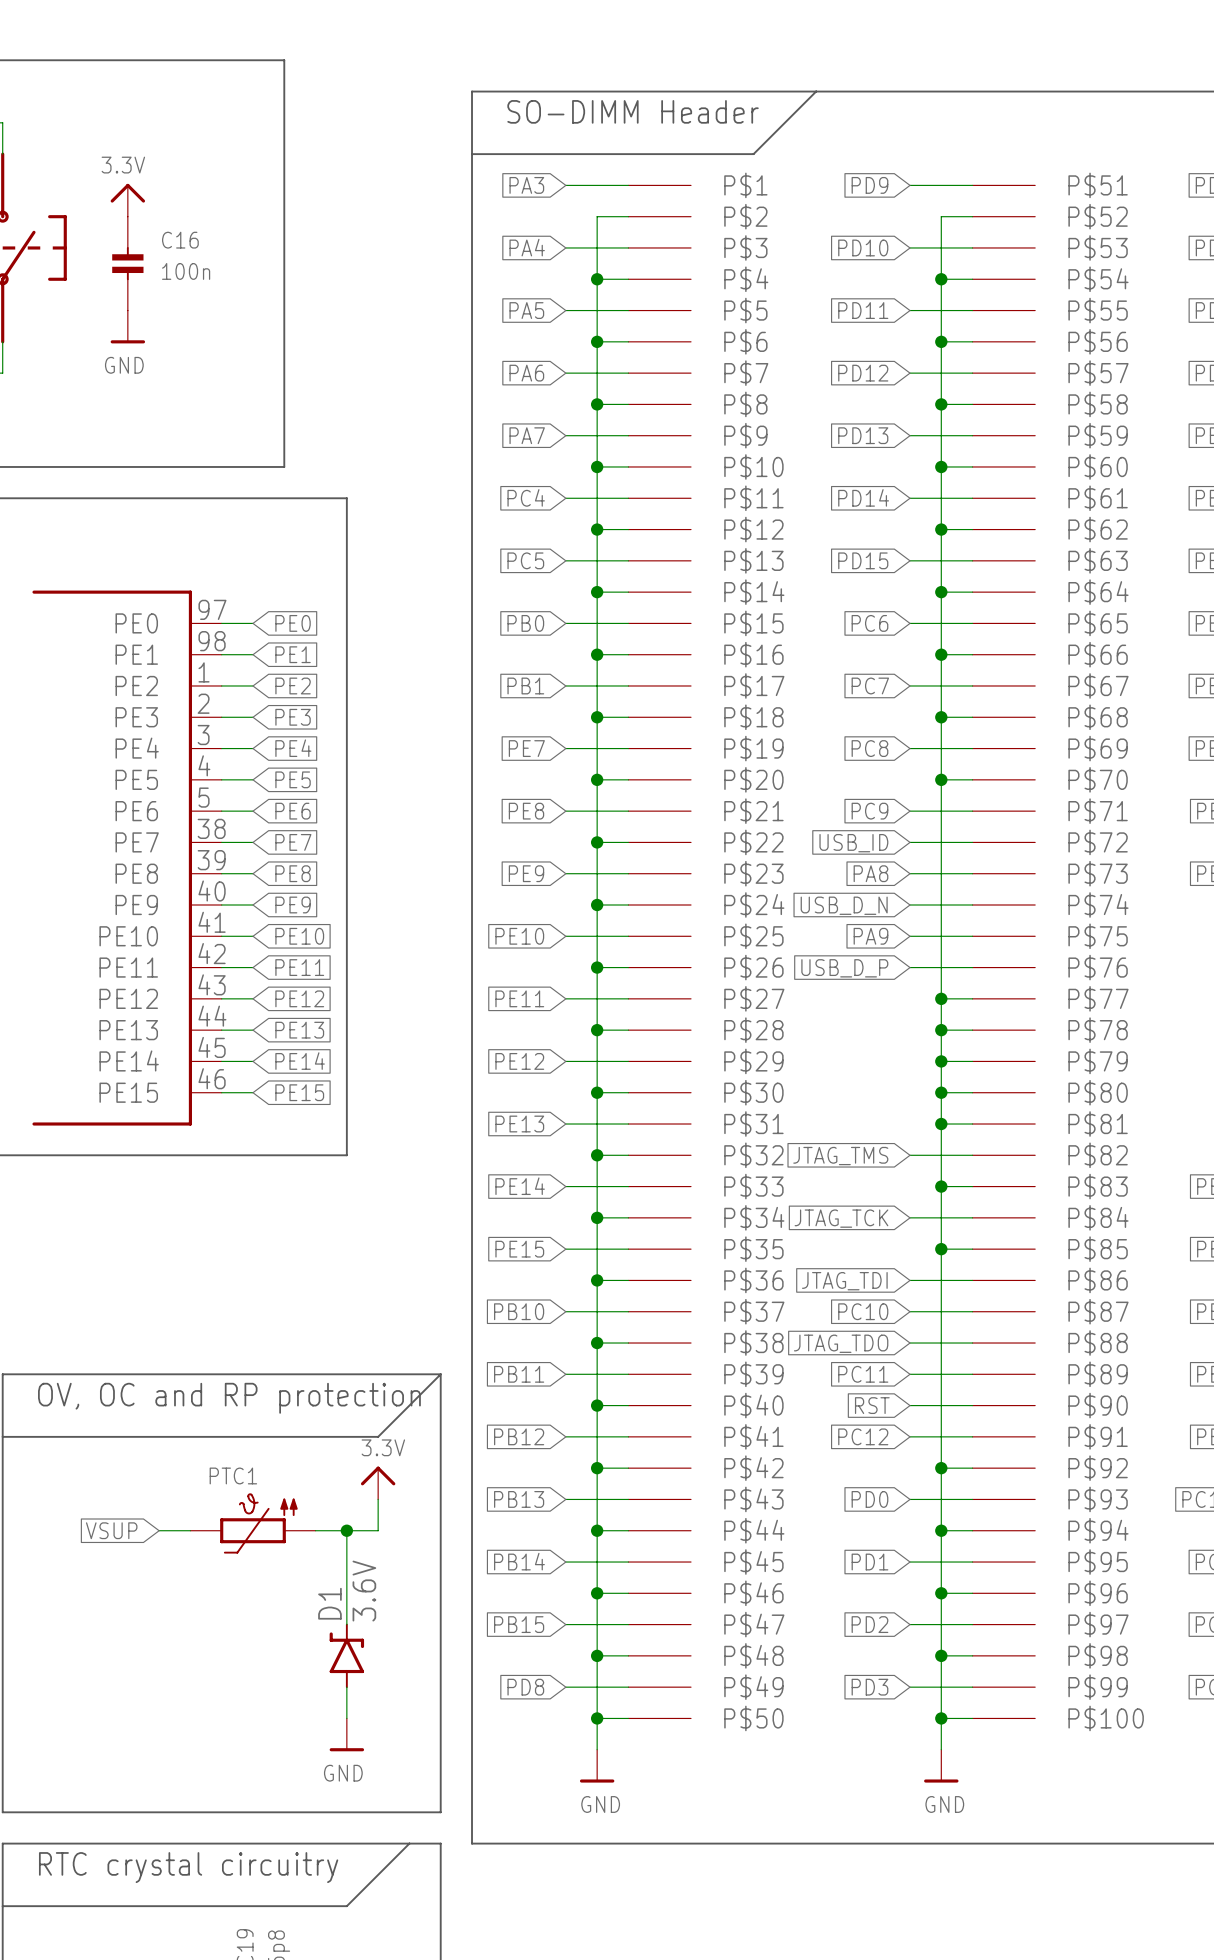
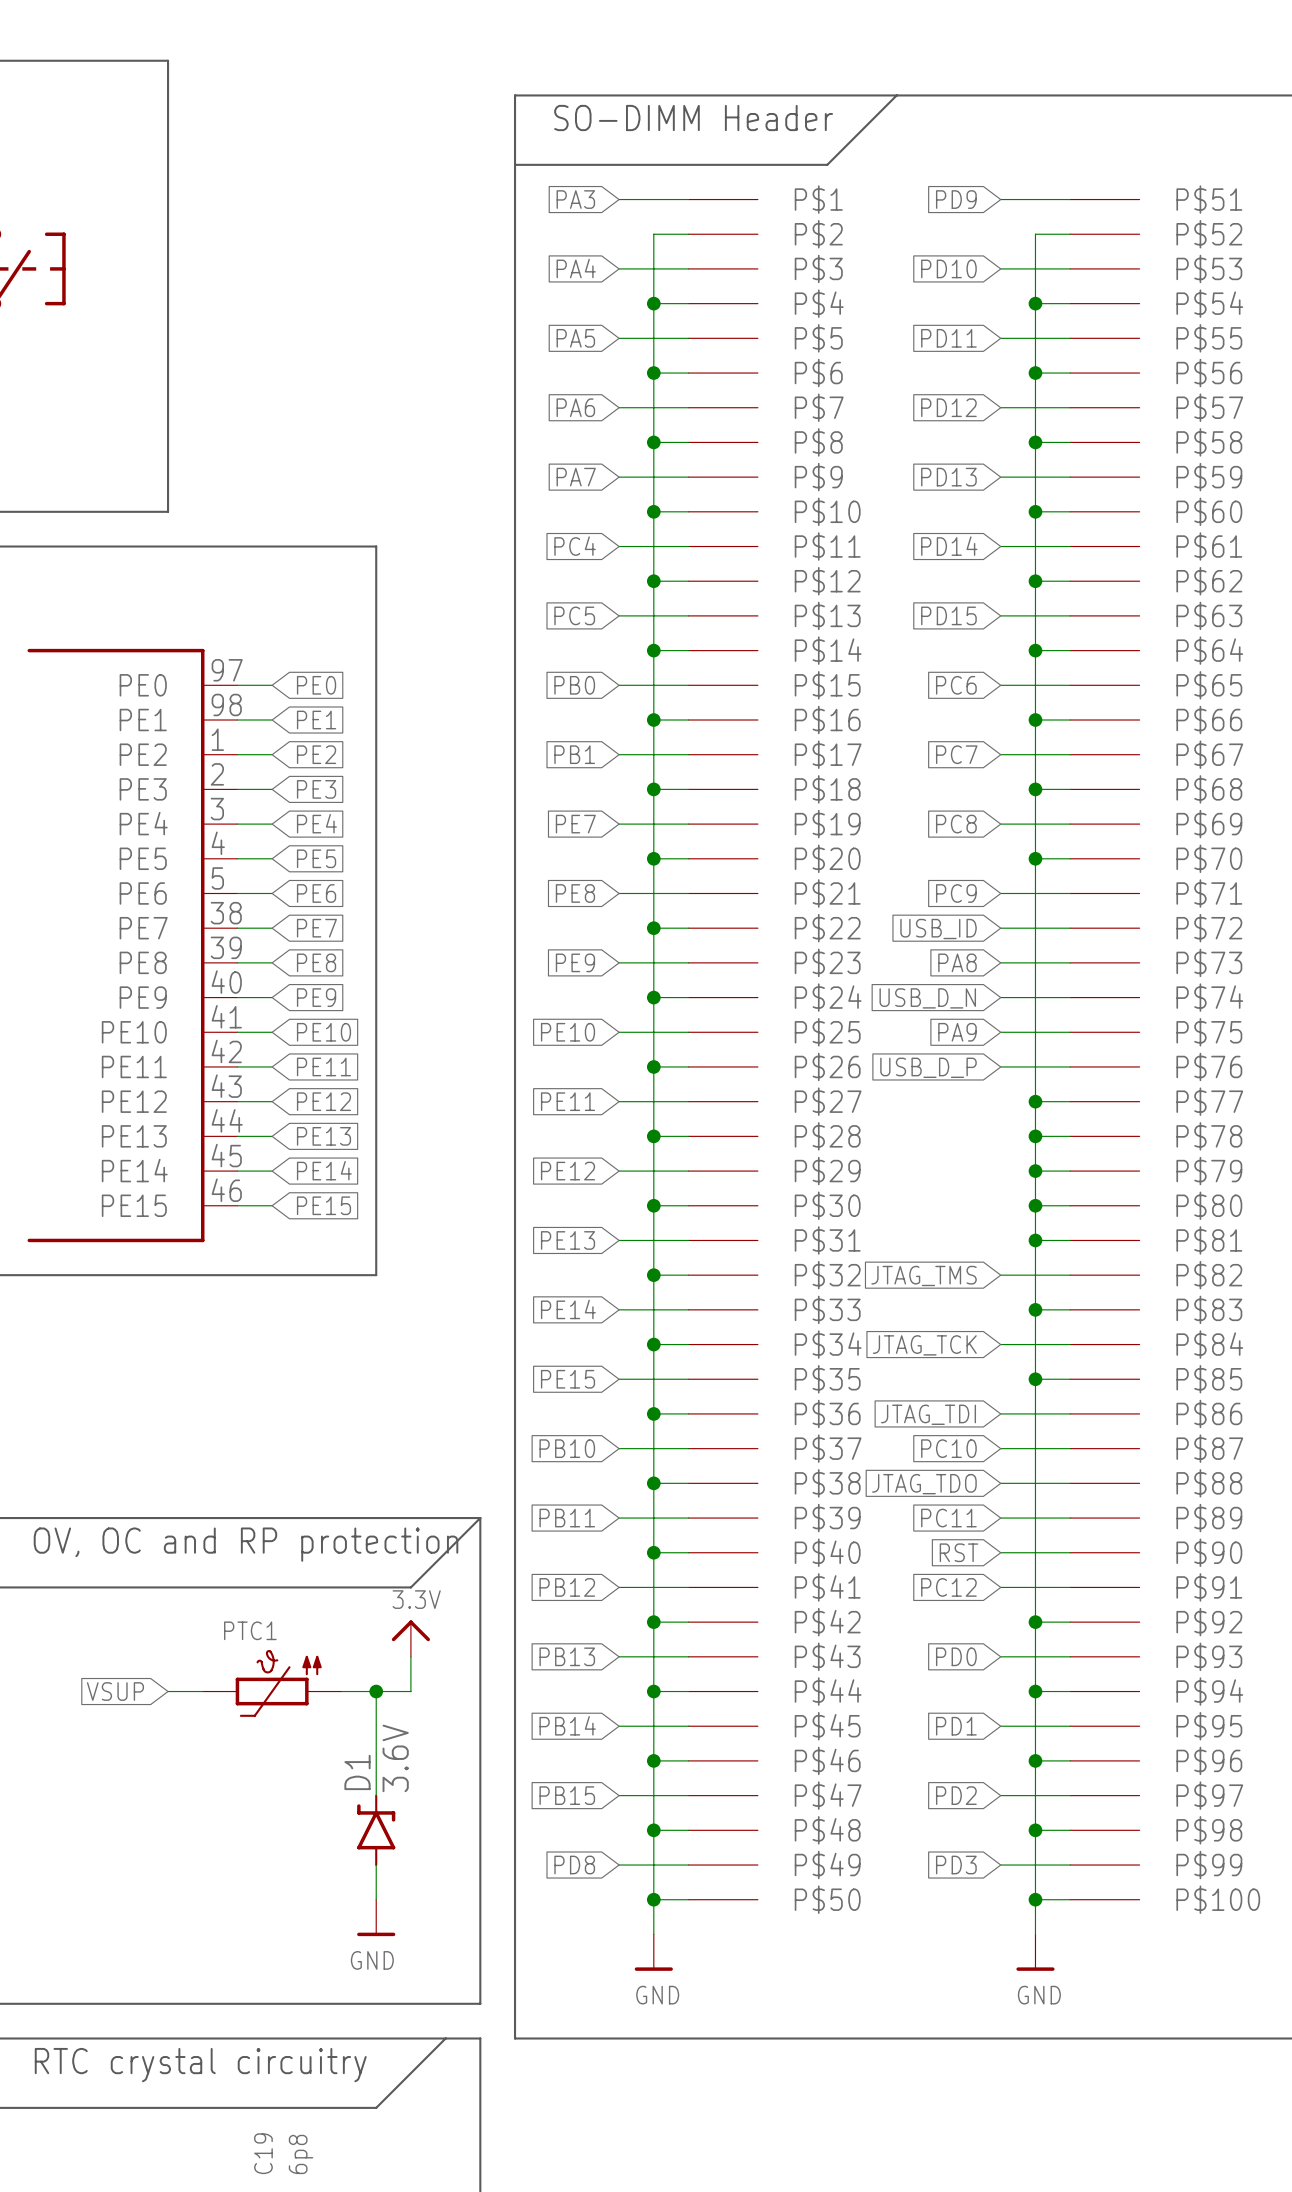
line: (159, 60) (284, 60) (284, 466) (159, 466) -> (168, 60) (168, 511)
power symbol: 3.3V (127, 200) -> none
C16: 100n (127, 263) -> none
power symbol: GND (127, 326) -> none

